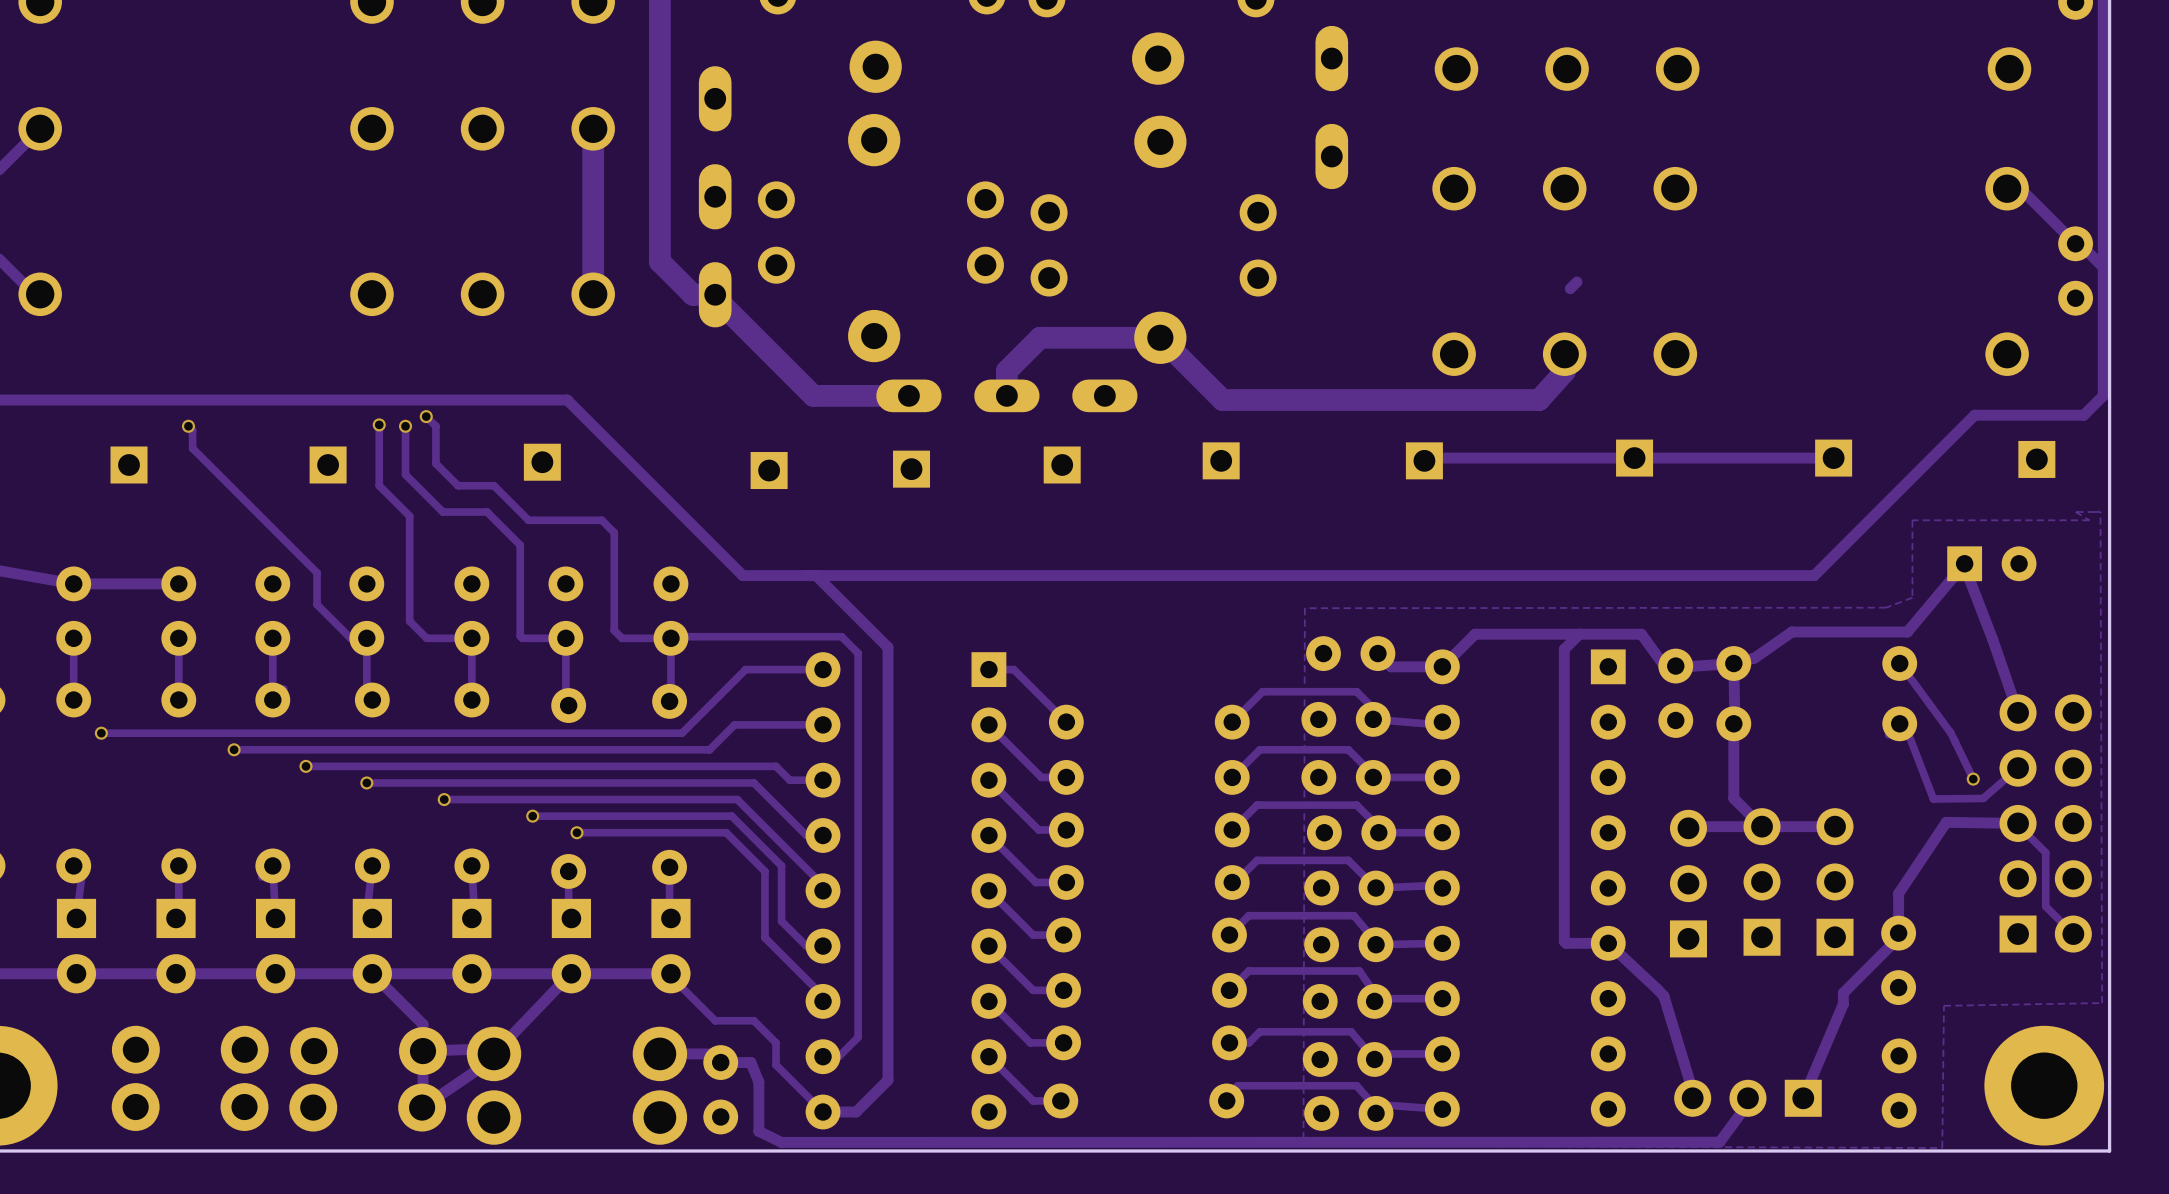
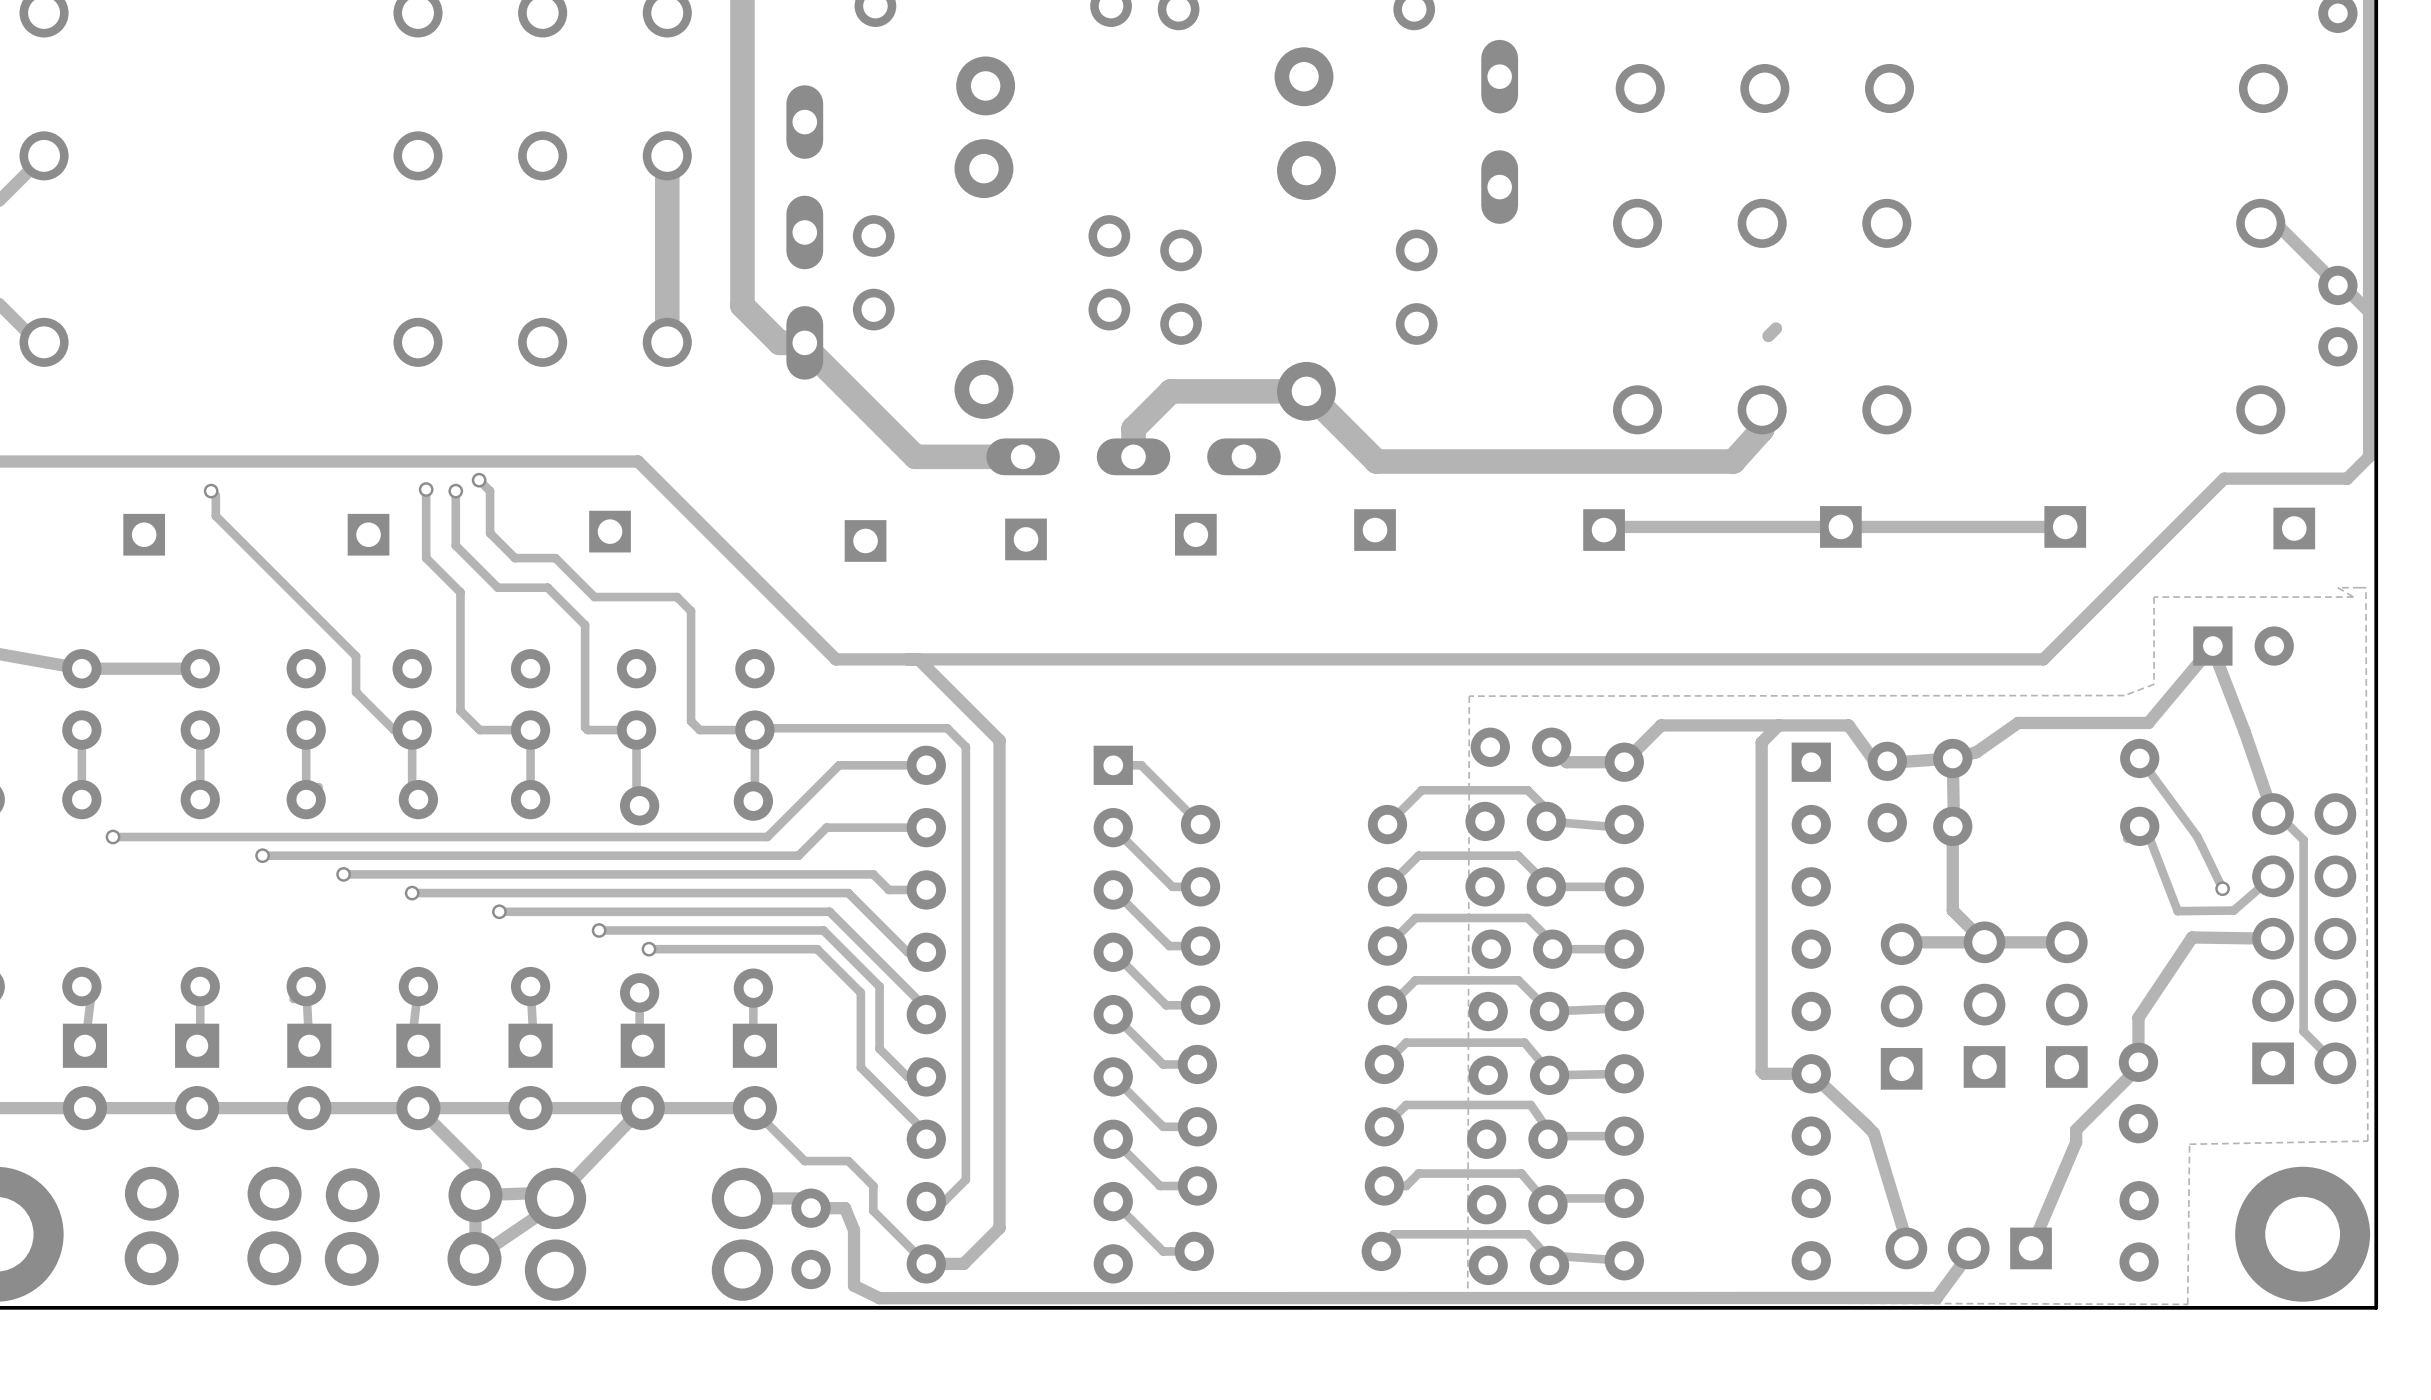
track: (2018, 823) (2045, 852) (2045, 906) -> (2277, 814) (2303, 840) (2304, 1032)

